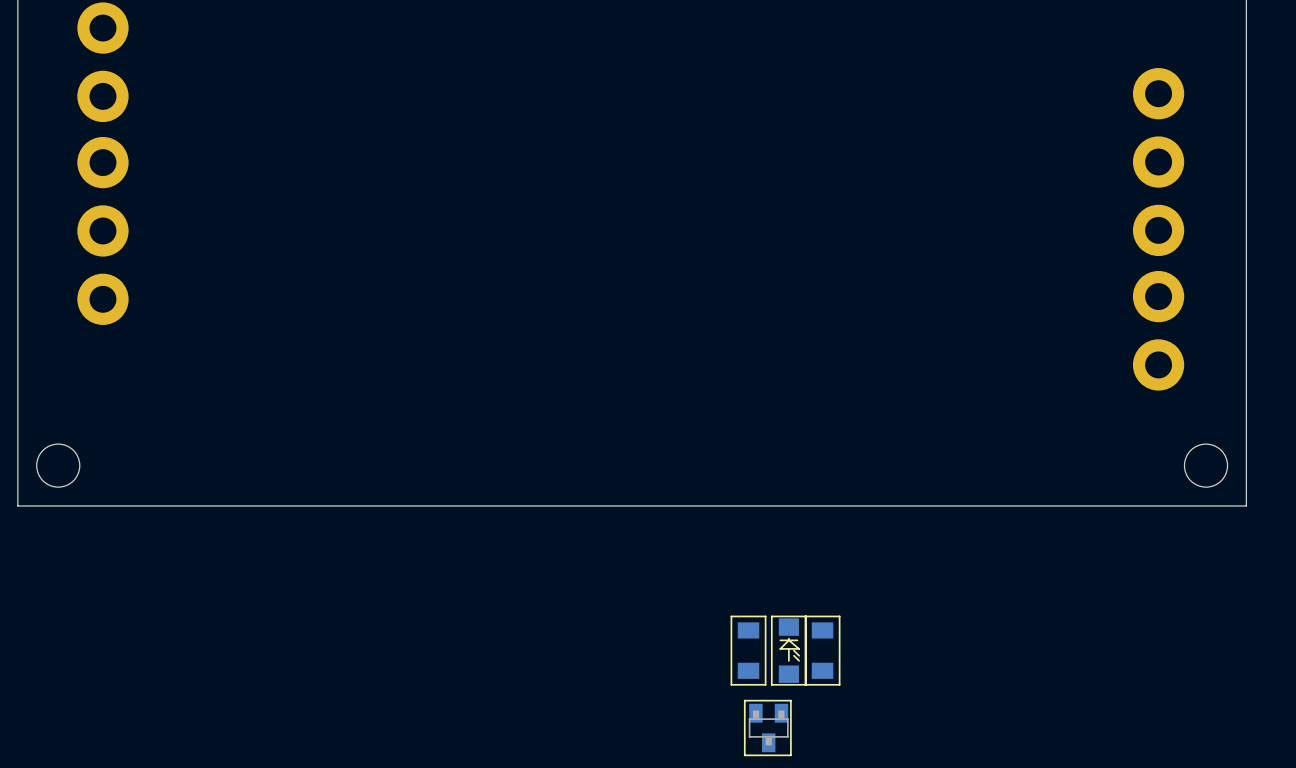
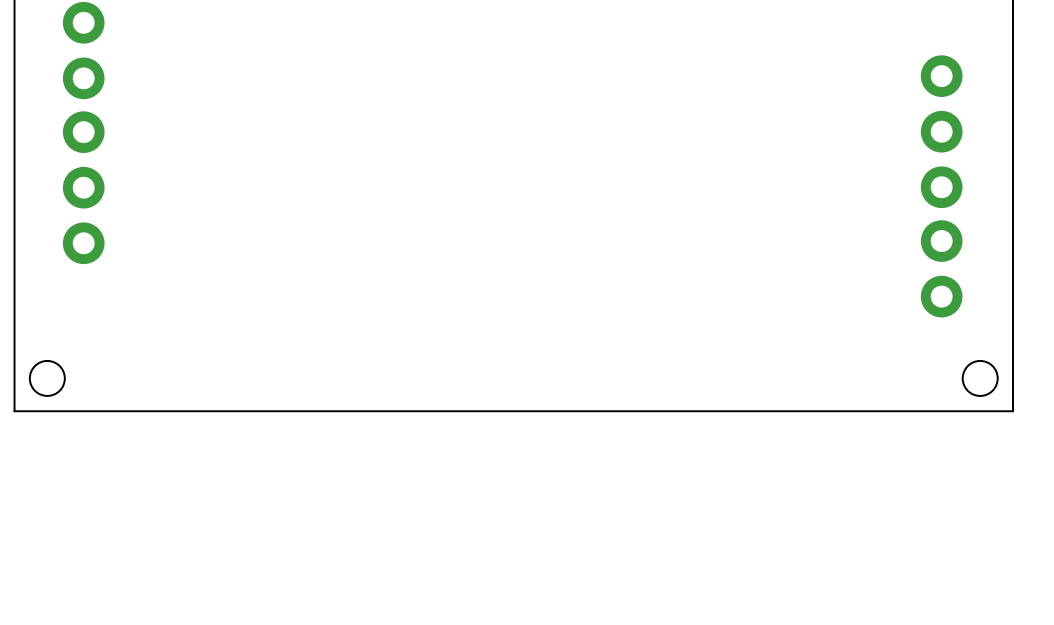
part: (748, 650) -> none
part: (788, 650) -> none
part: (822, 650) -> none
part: (767, 728) -> none

